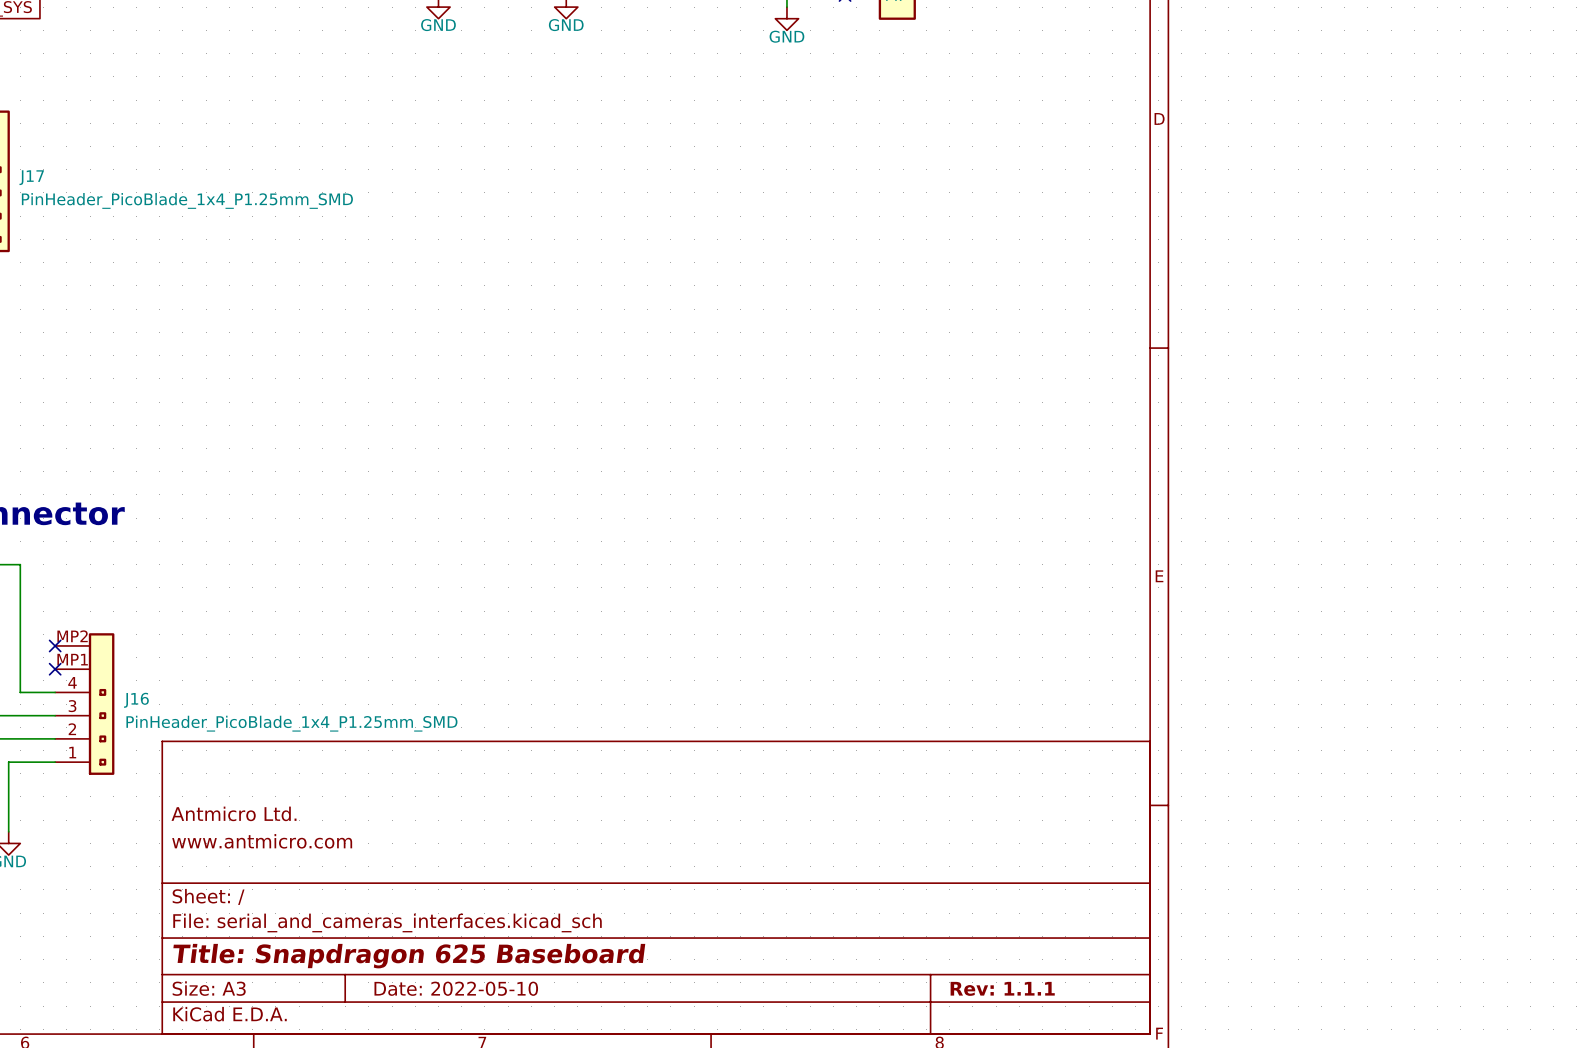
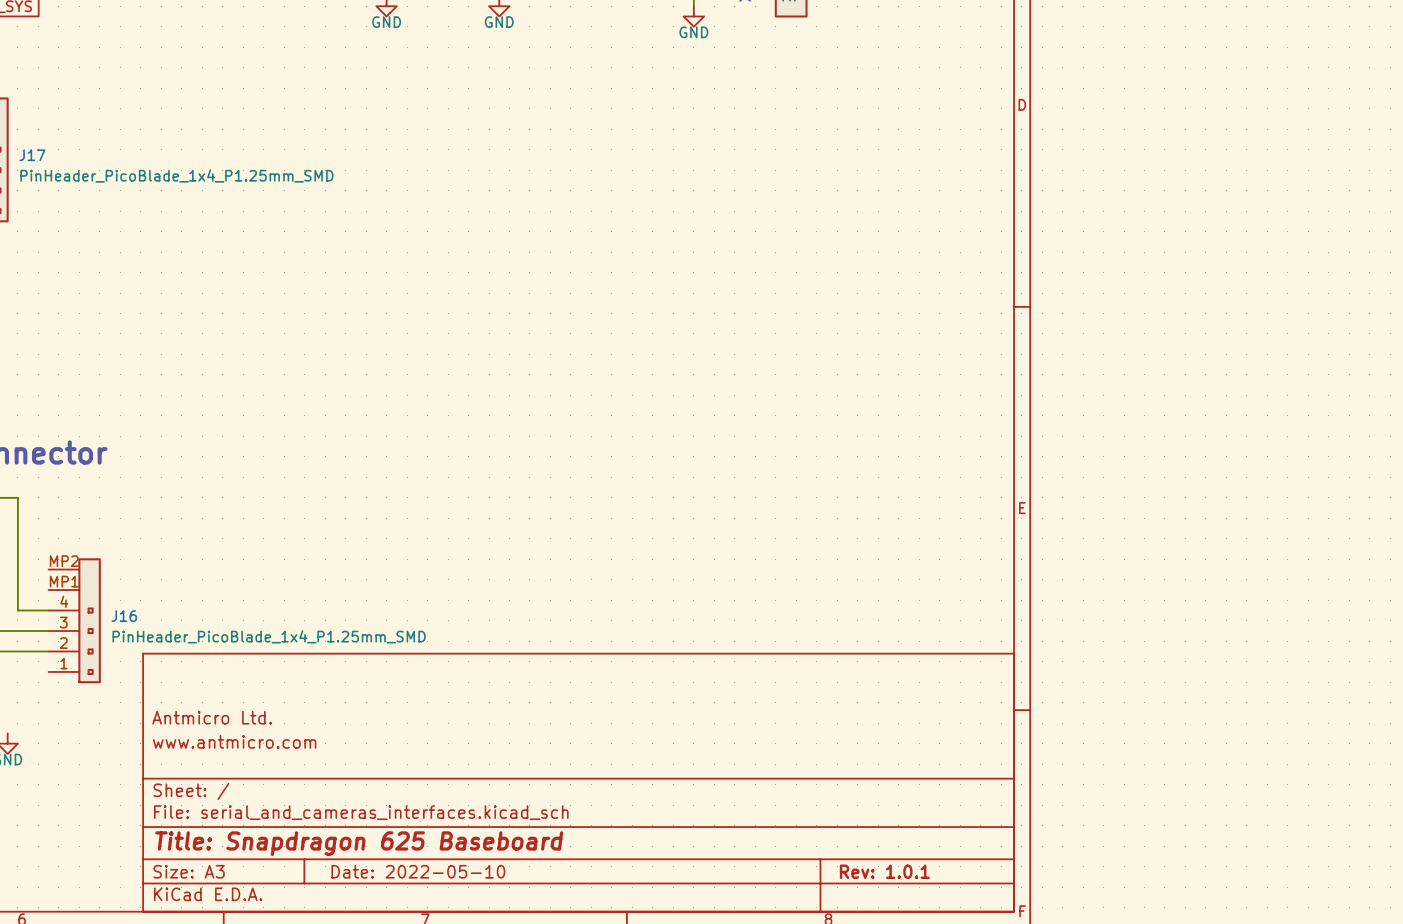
no-connect mark: (55, 645) -> none
no-connect mark: (55, 669) -> none
wire: (55, 762) (8, 762) (8, 831) -> none
title block: Rev: 1.1.1 (1002, 988) -> Rev: 1.0.1 (884, 871)

